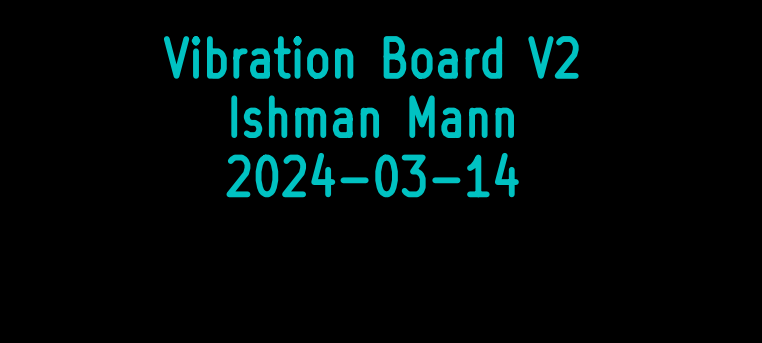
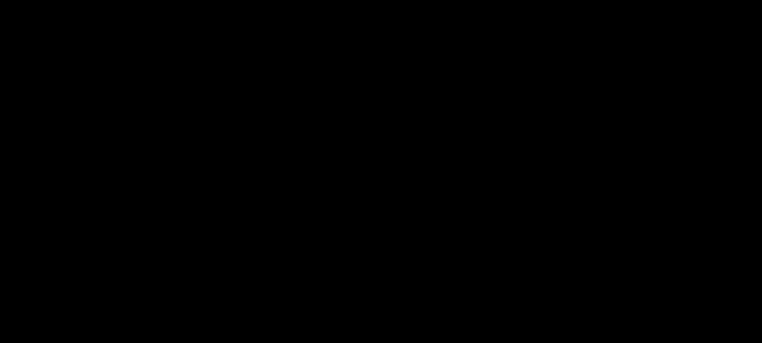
text: Vibration Board V2 (371, 57) -> none
text: Ishman Mann (372, 116) -> none
text: 2024-03-14 (372, 175) -> none

